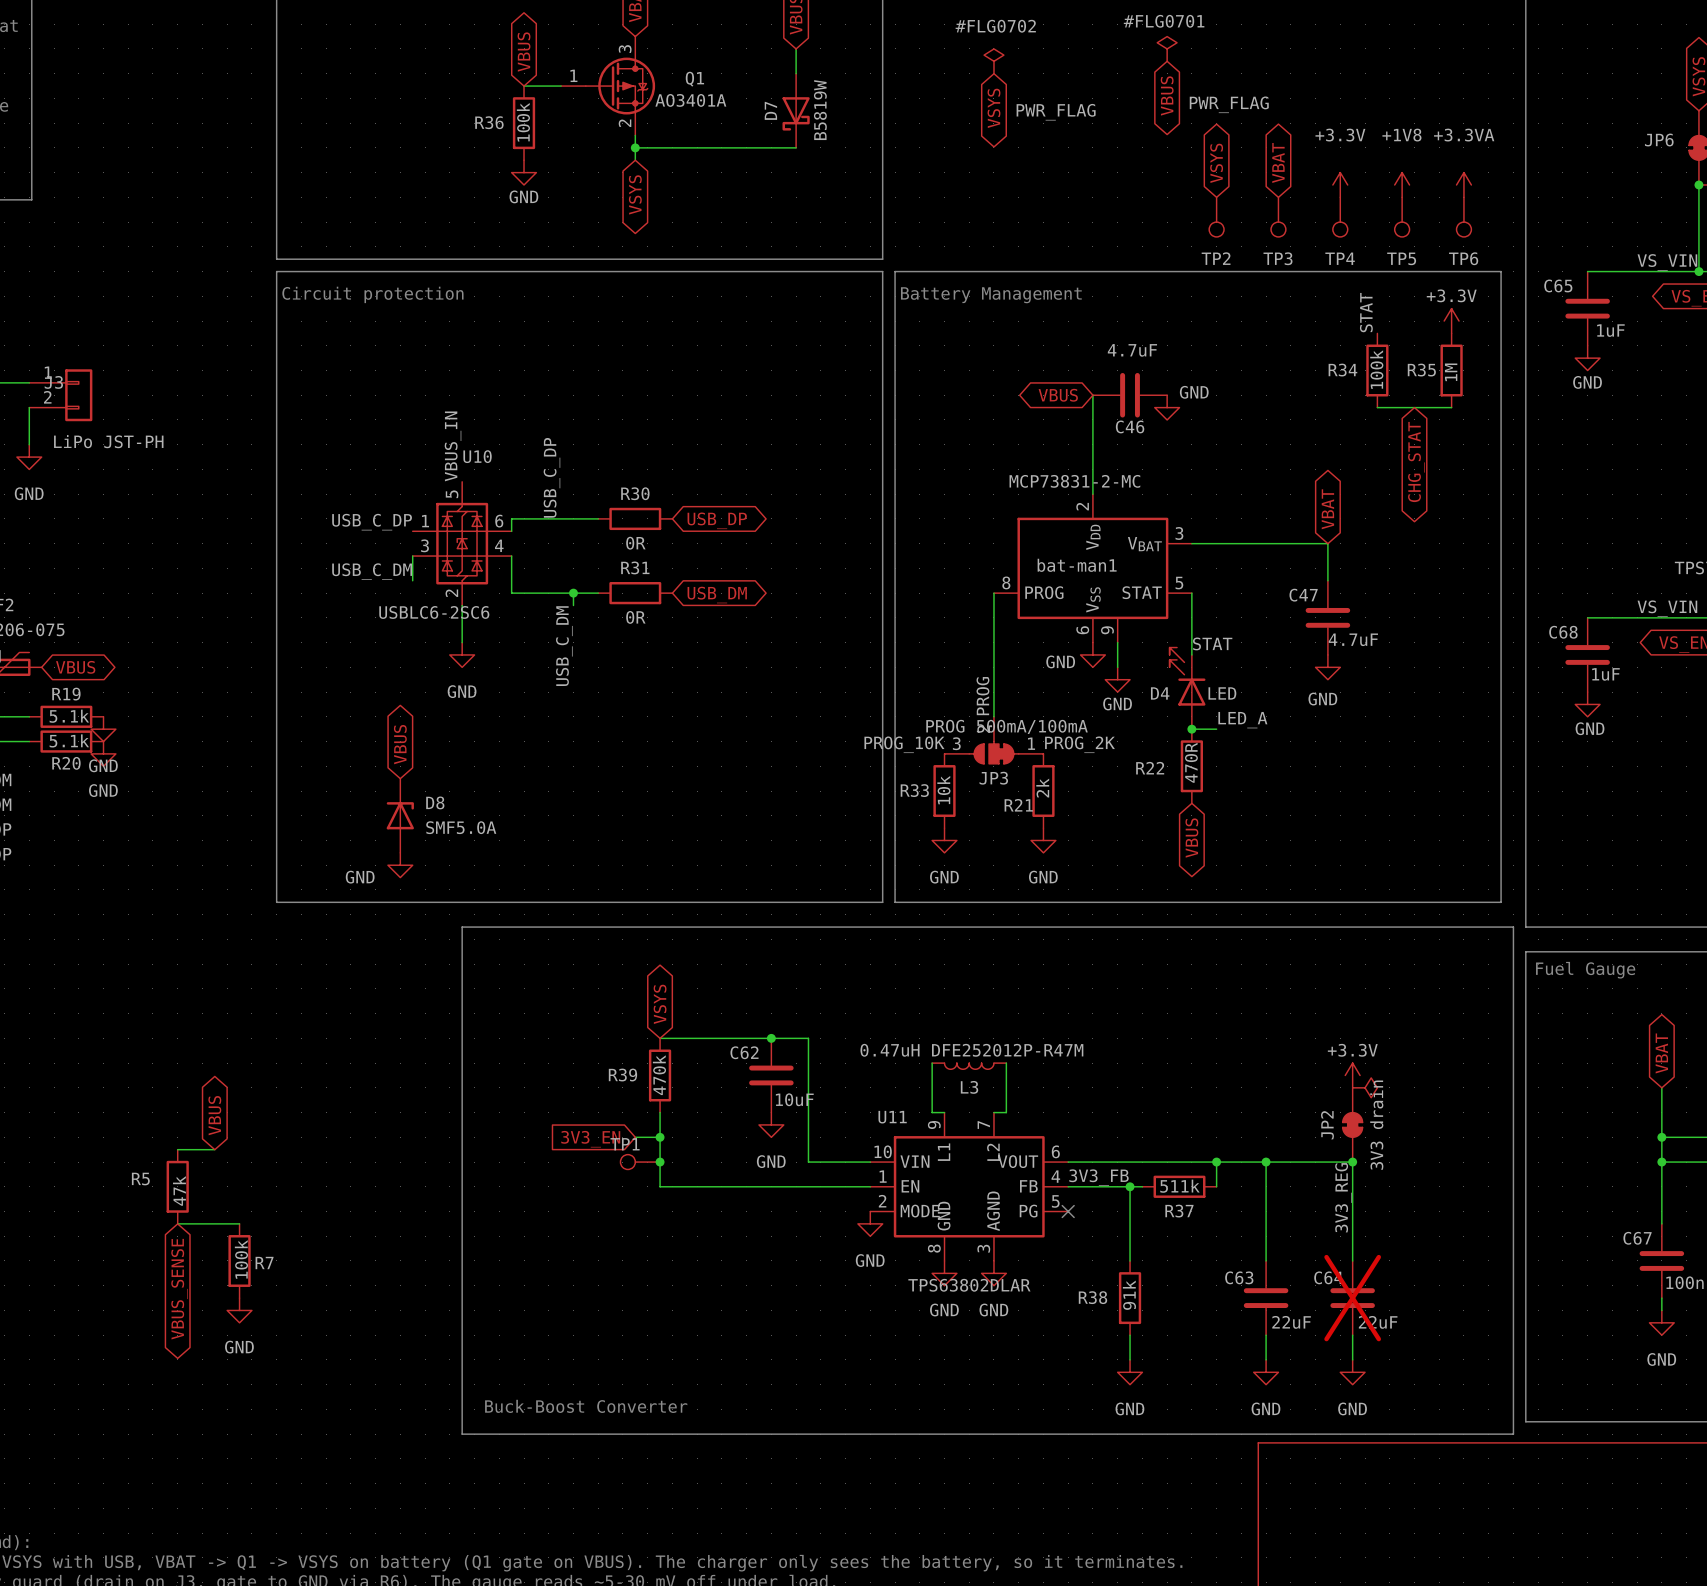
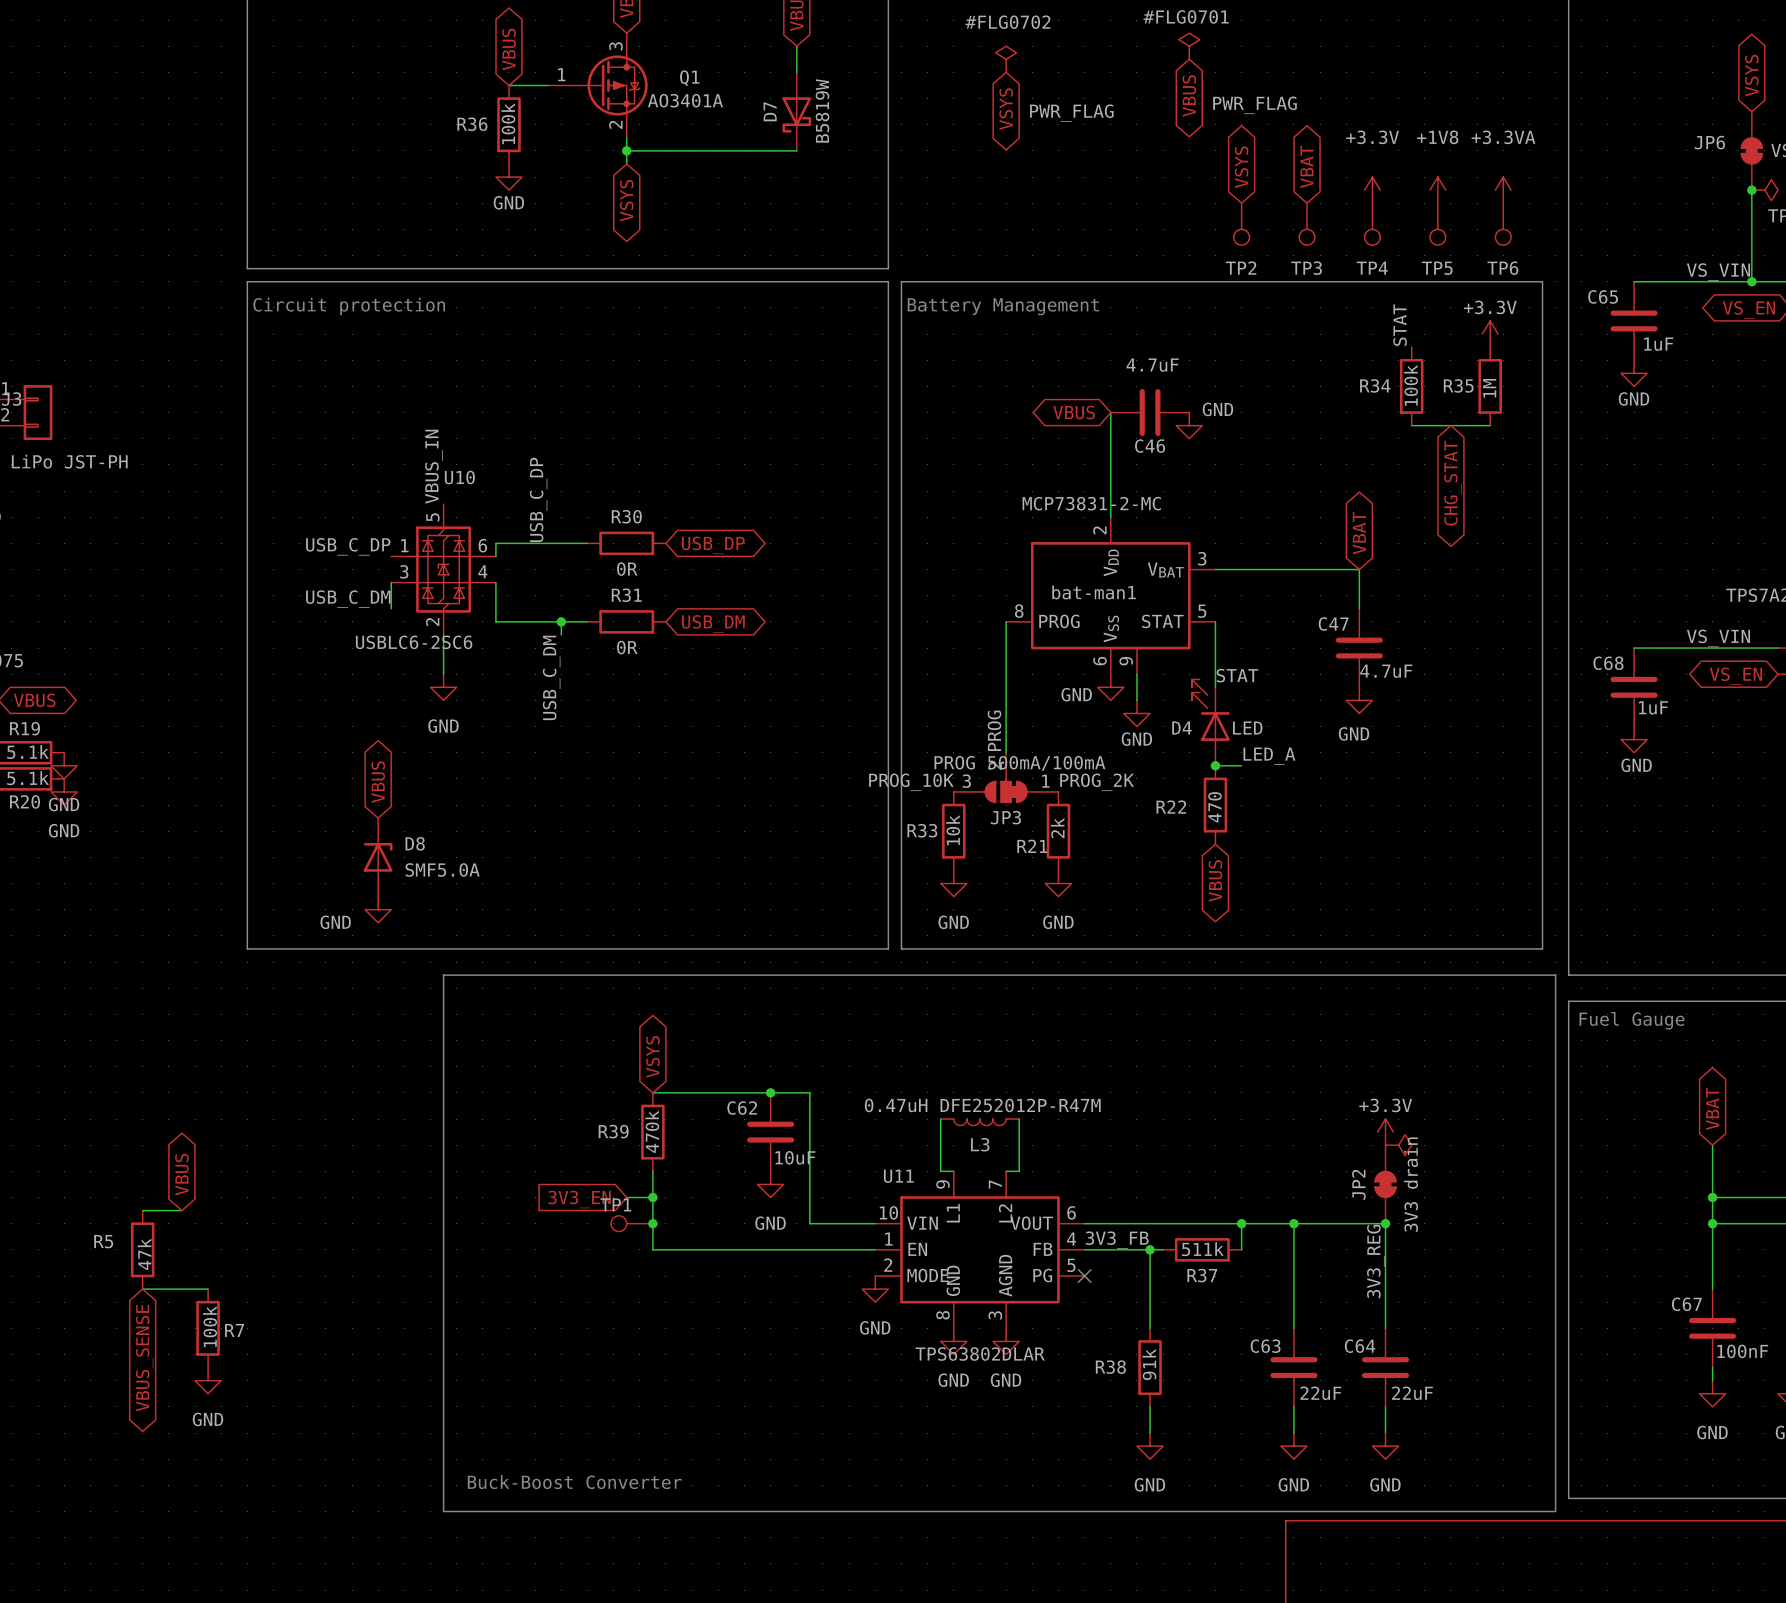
R22 value: 470R (1191, 762) -> 470 (1214, 807)
C64 do-not-place cross: (1352, 1298) -> none

